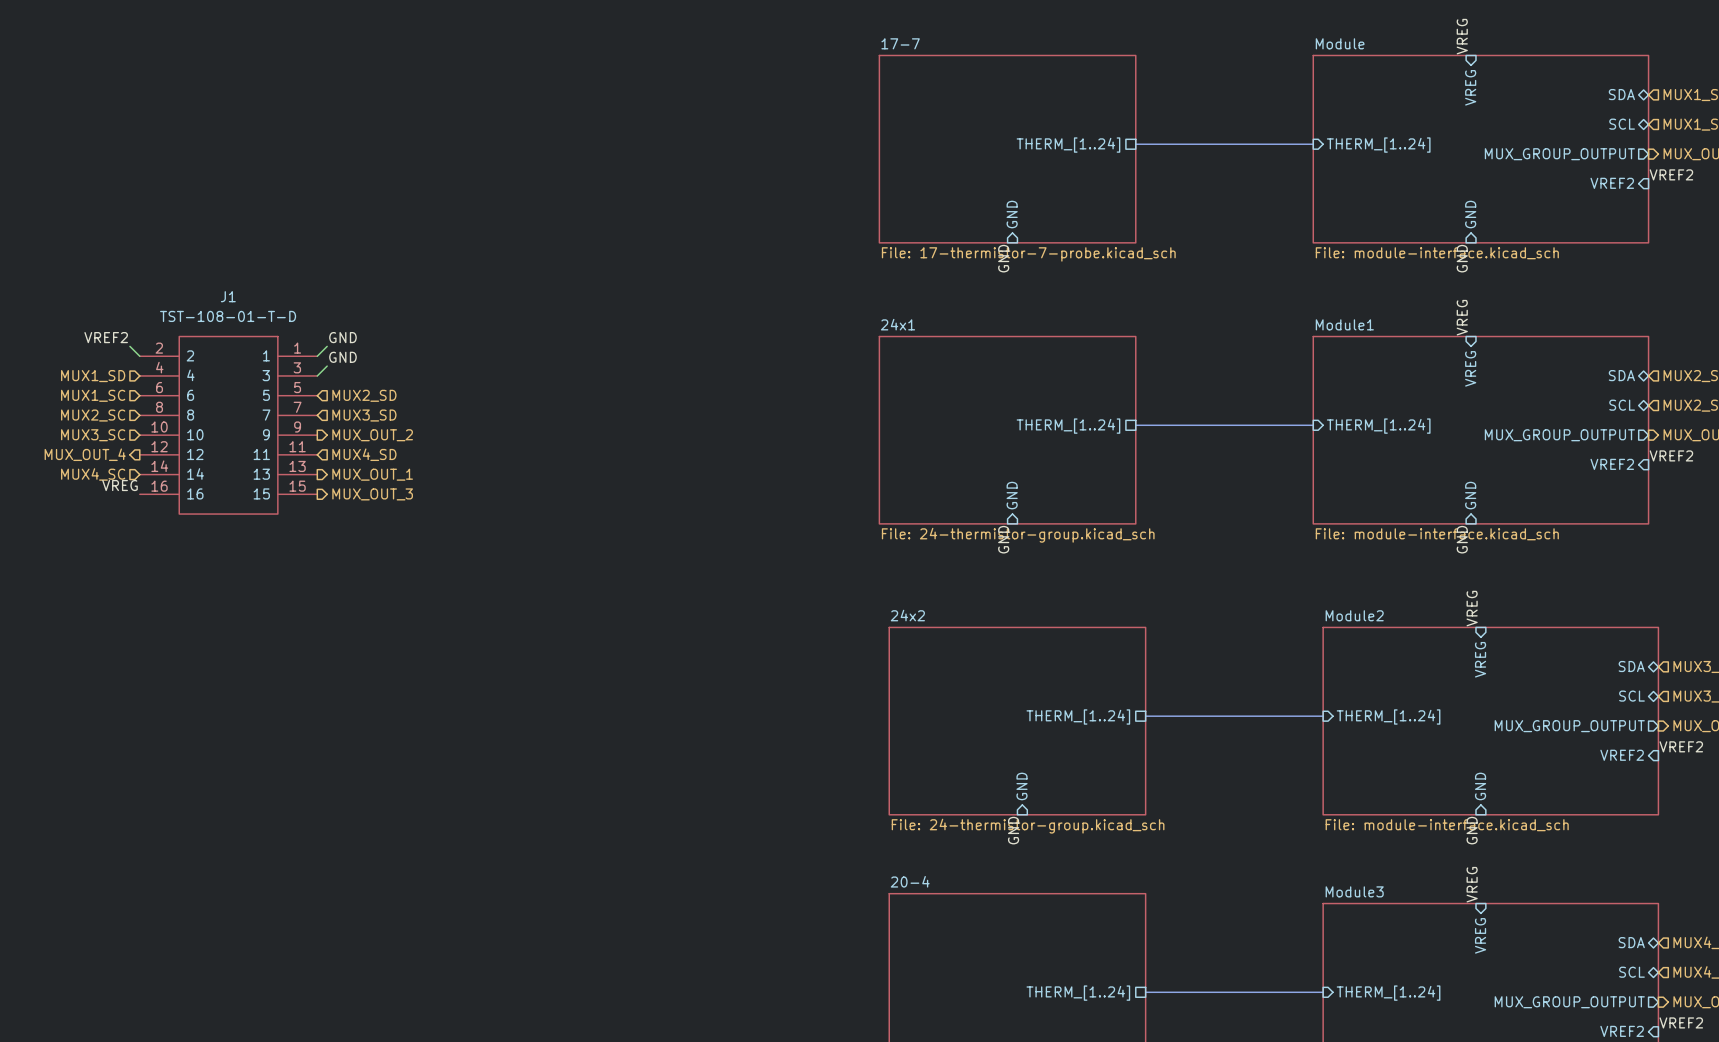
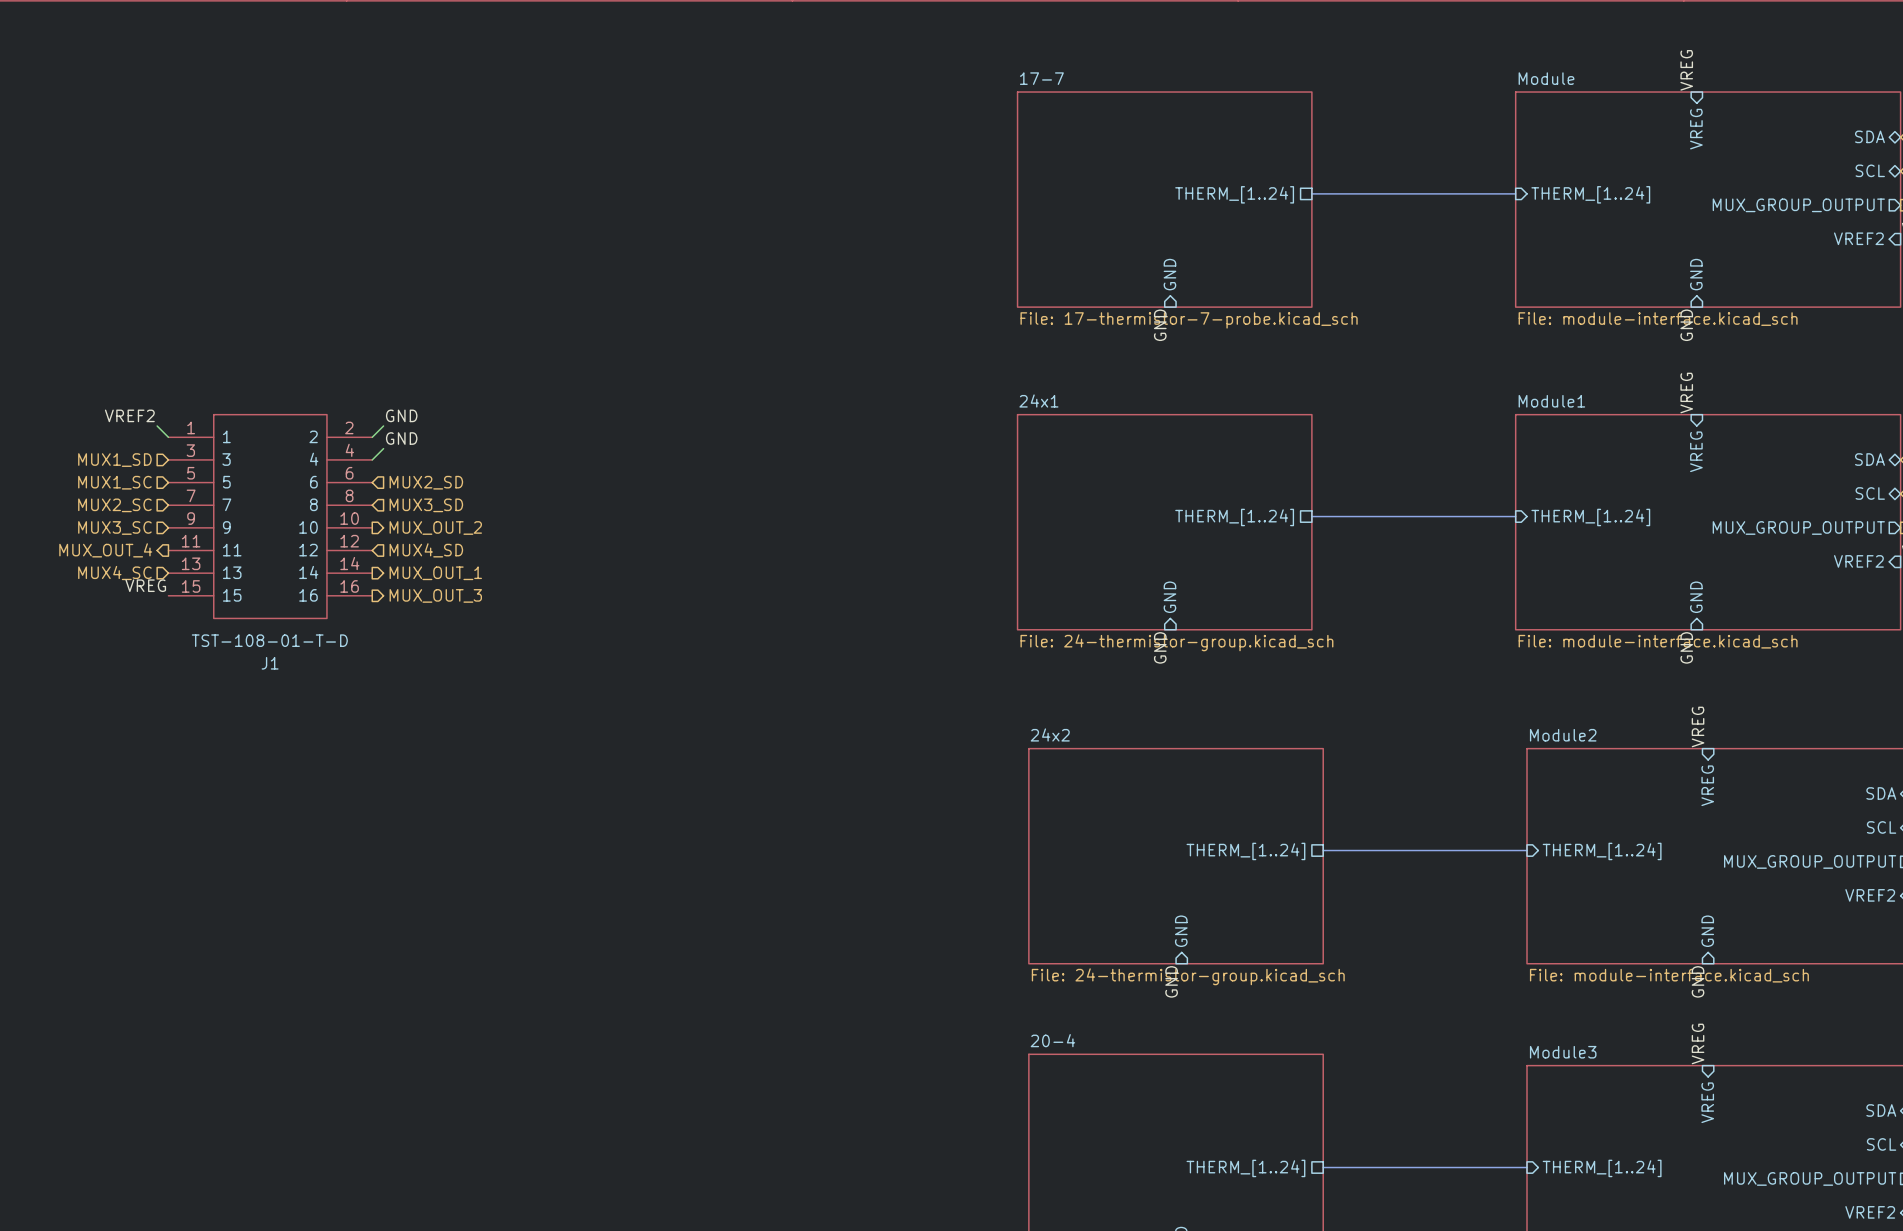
J1 name position: J1 (228, 296) -> J1 (270, 663)
J1 value position: TST-108-01-T-D (228, 316) -> TST-108-01-T-D (269, 640)
J1 flip: as is (228, 425) -> left-right (270, 516)

